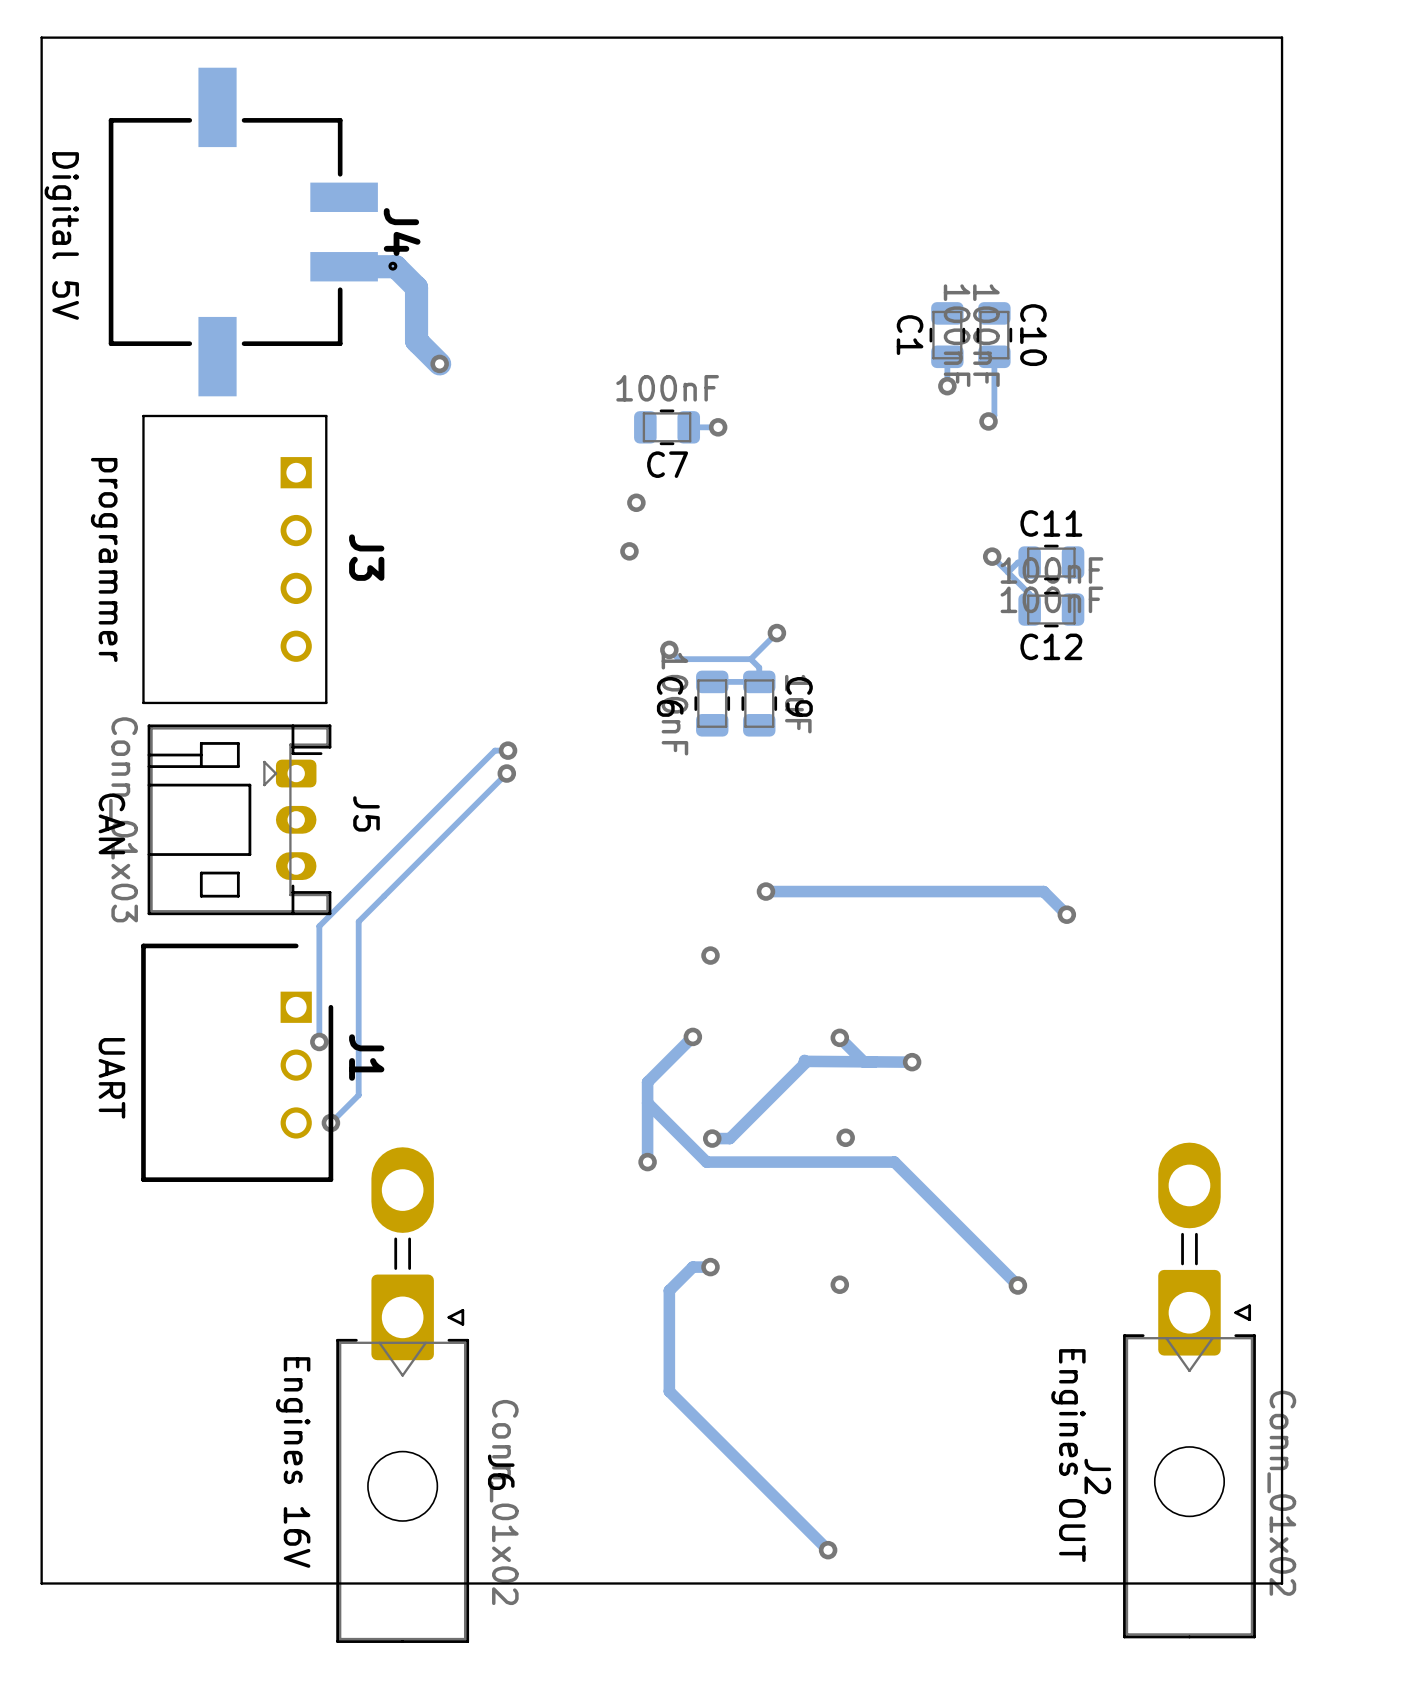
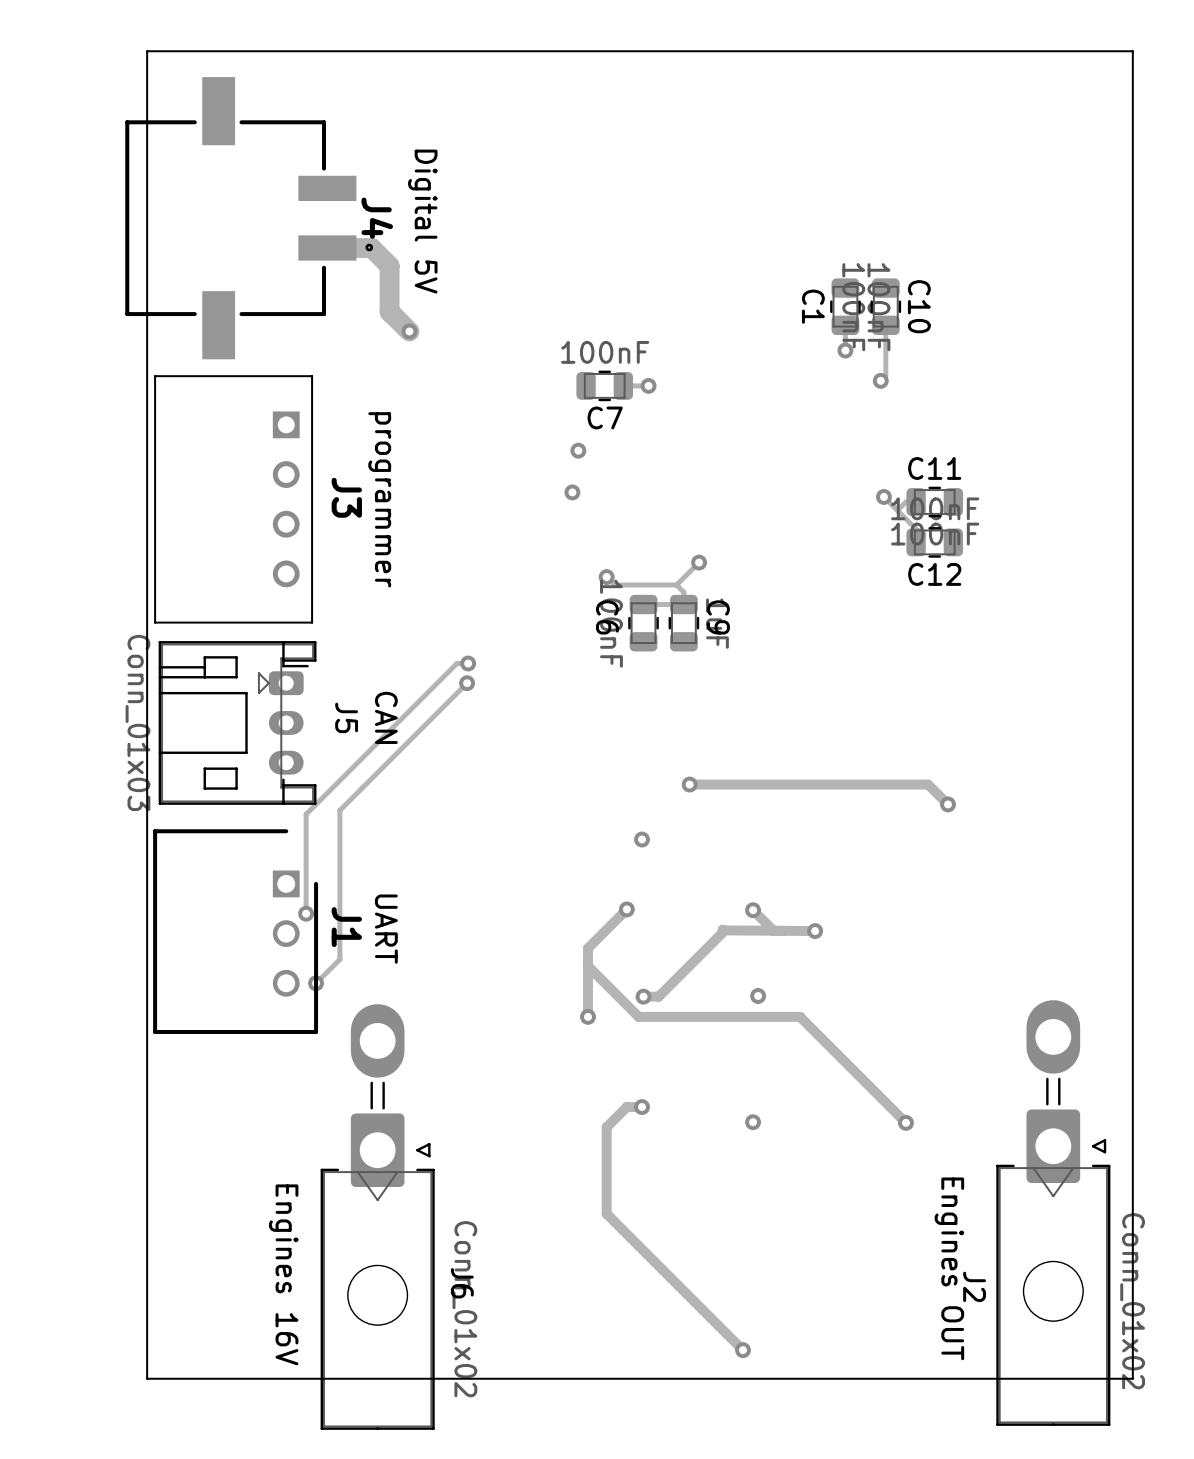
board edge: (134, 37) (41, 37) (41, 1583) (134, 1583) -> (147, 51) (147, 1378)
text position: Digital 5V (61, 235) -> Digital 5V (422, 221)
text position: programmer (104, 559) -> programmer (379, 499)
text position: CAN (111, 823) -> CAN (386, 717)
text position: UART (111, 1078) -> UART (386, 929)

